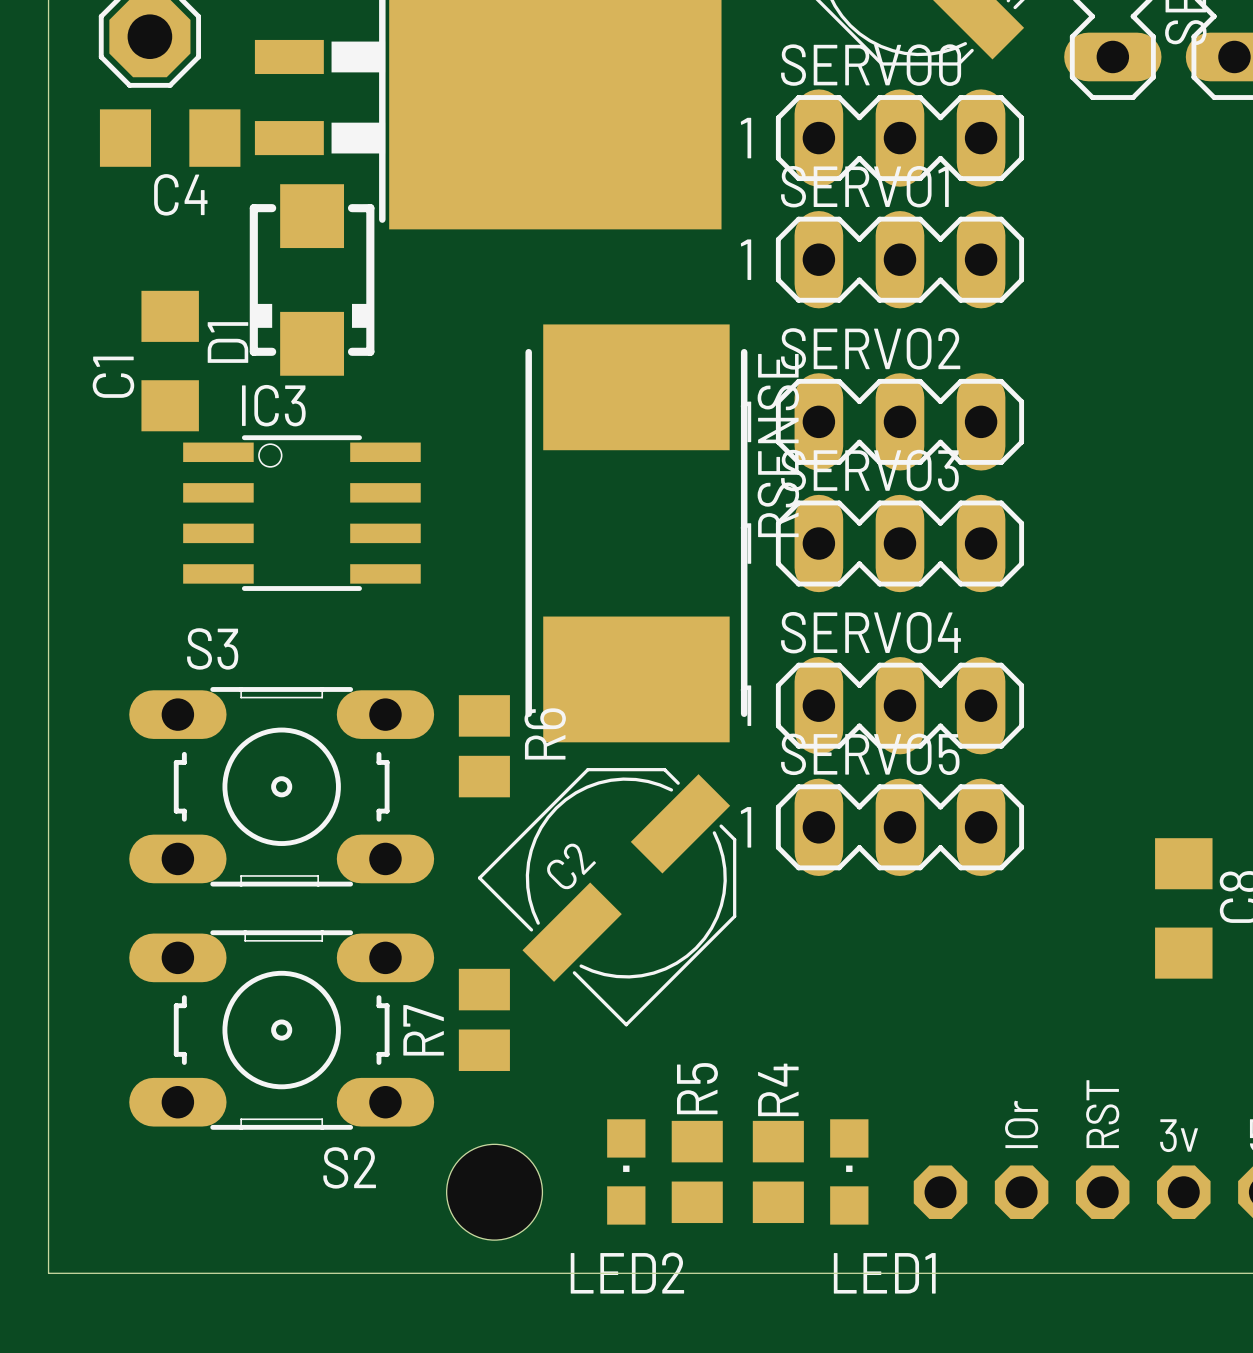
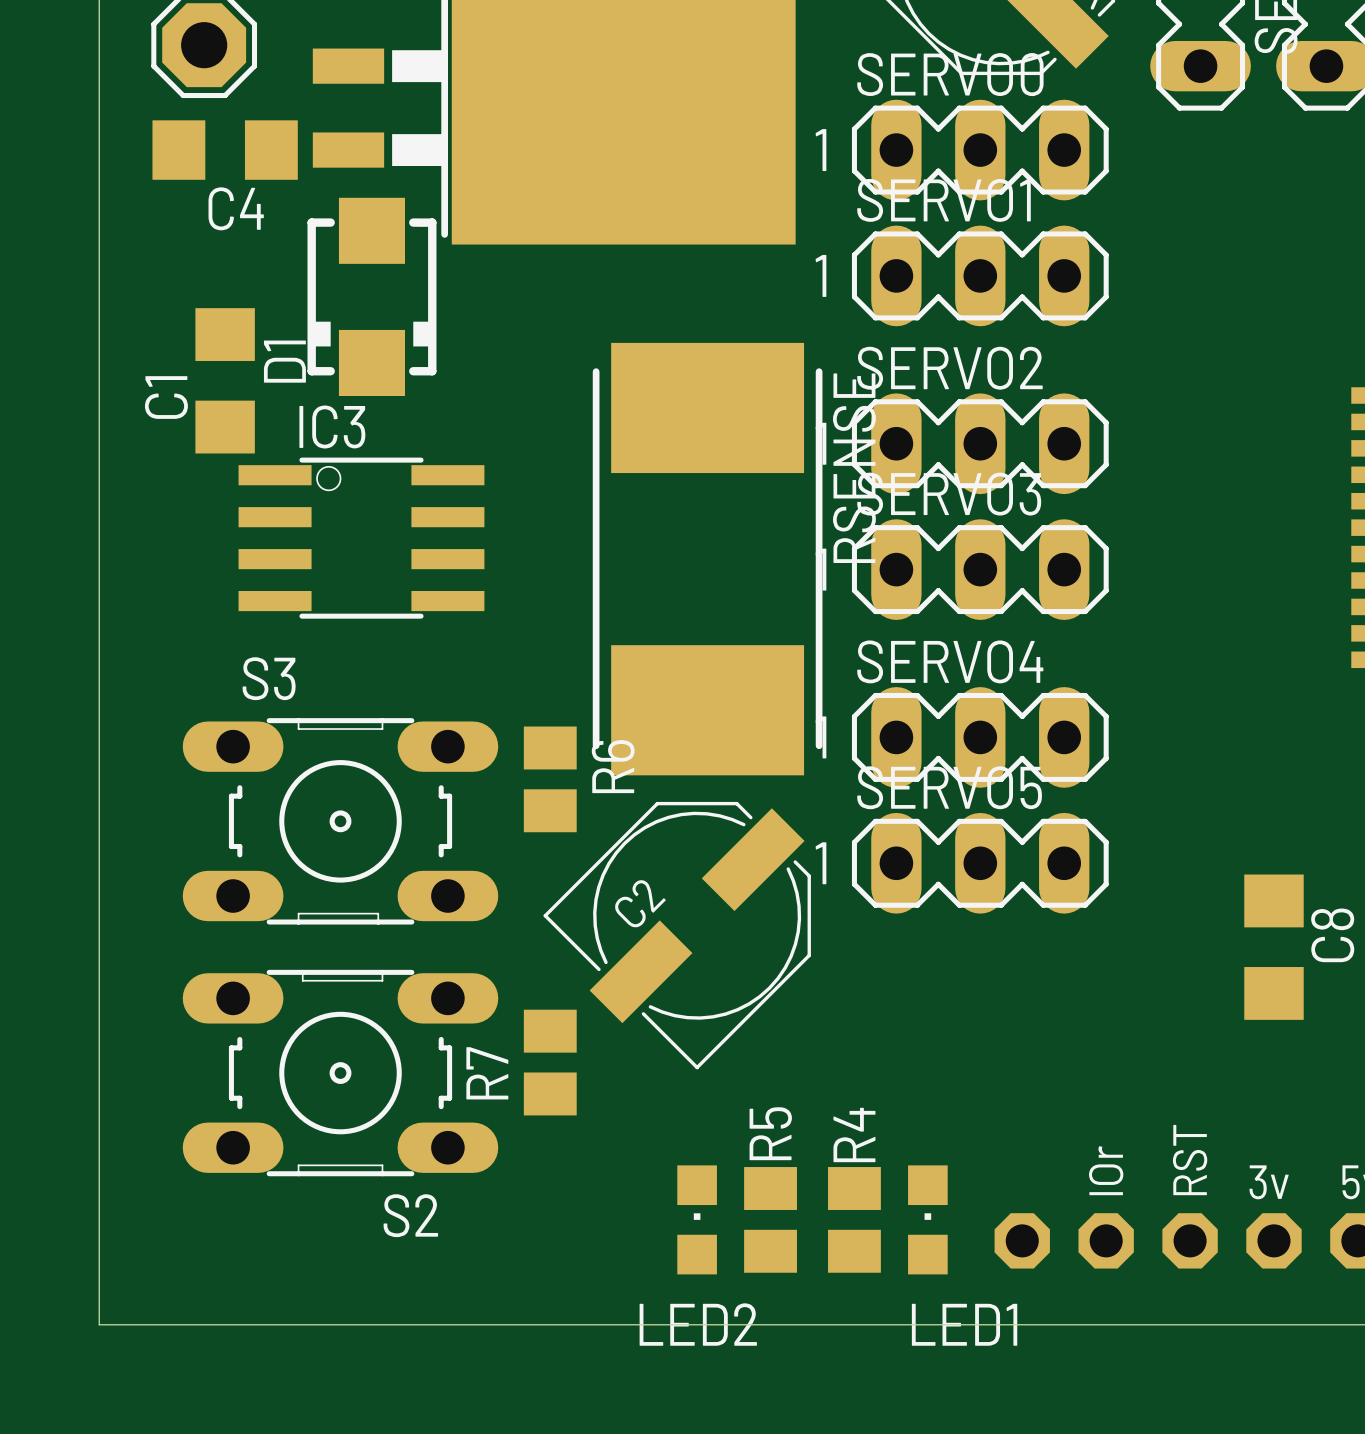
hole: (494, 1192) -> none

